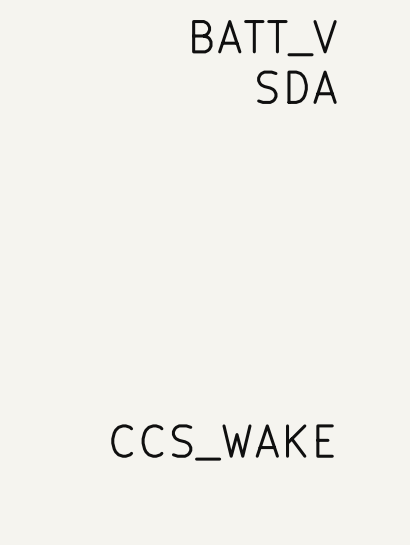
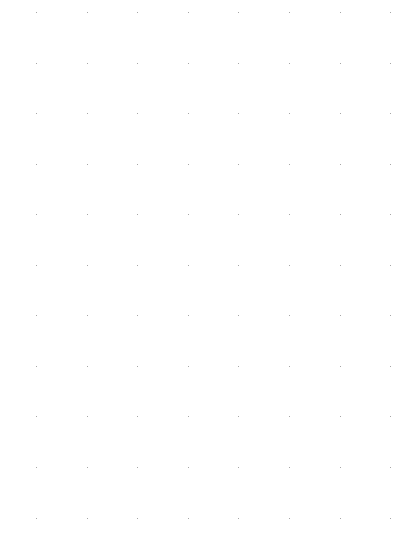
label: BATT_V (264, 38) -> none
label: SDA (296, 87) -> none
label: CCS_WAKE (222, 442) -> none

